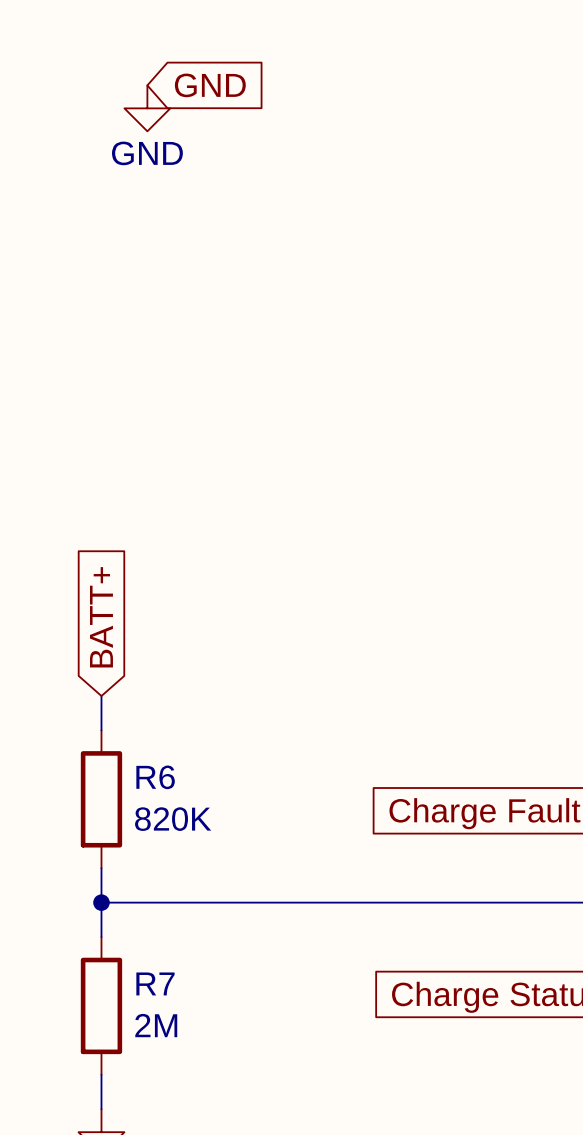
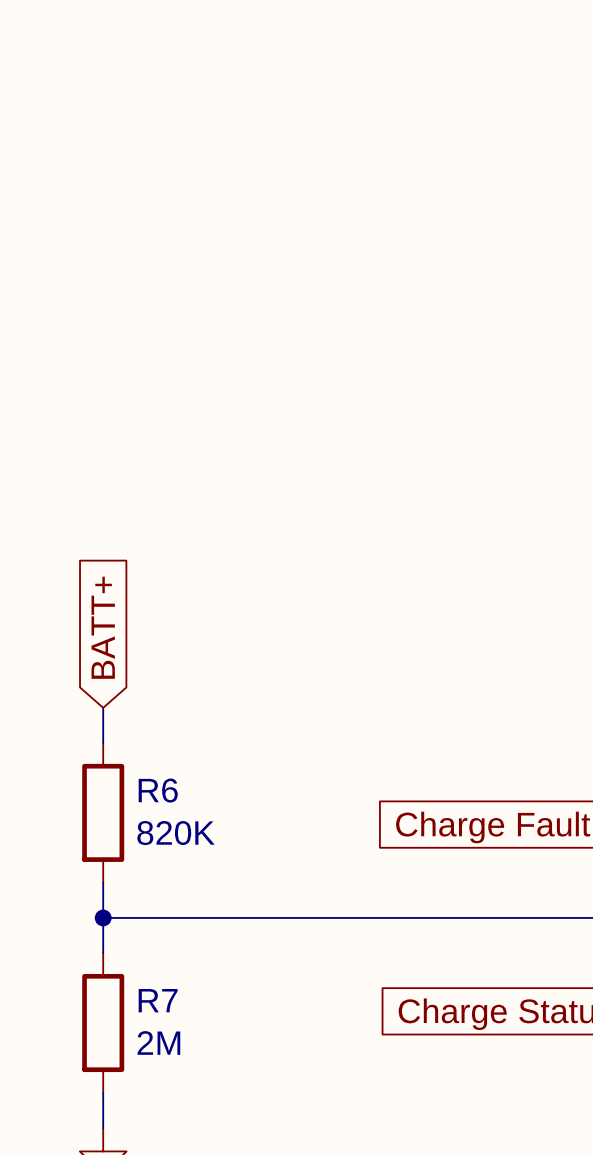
global label: GND (210, 85) -> none
power symbol: GND (147, 108) -> none

